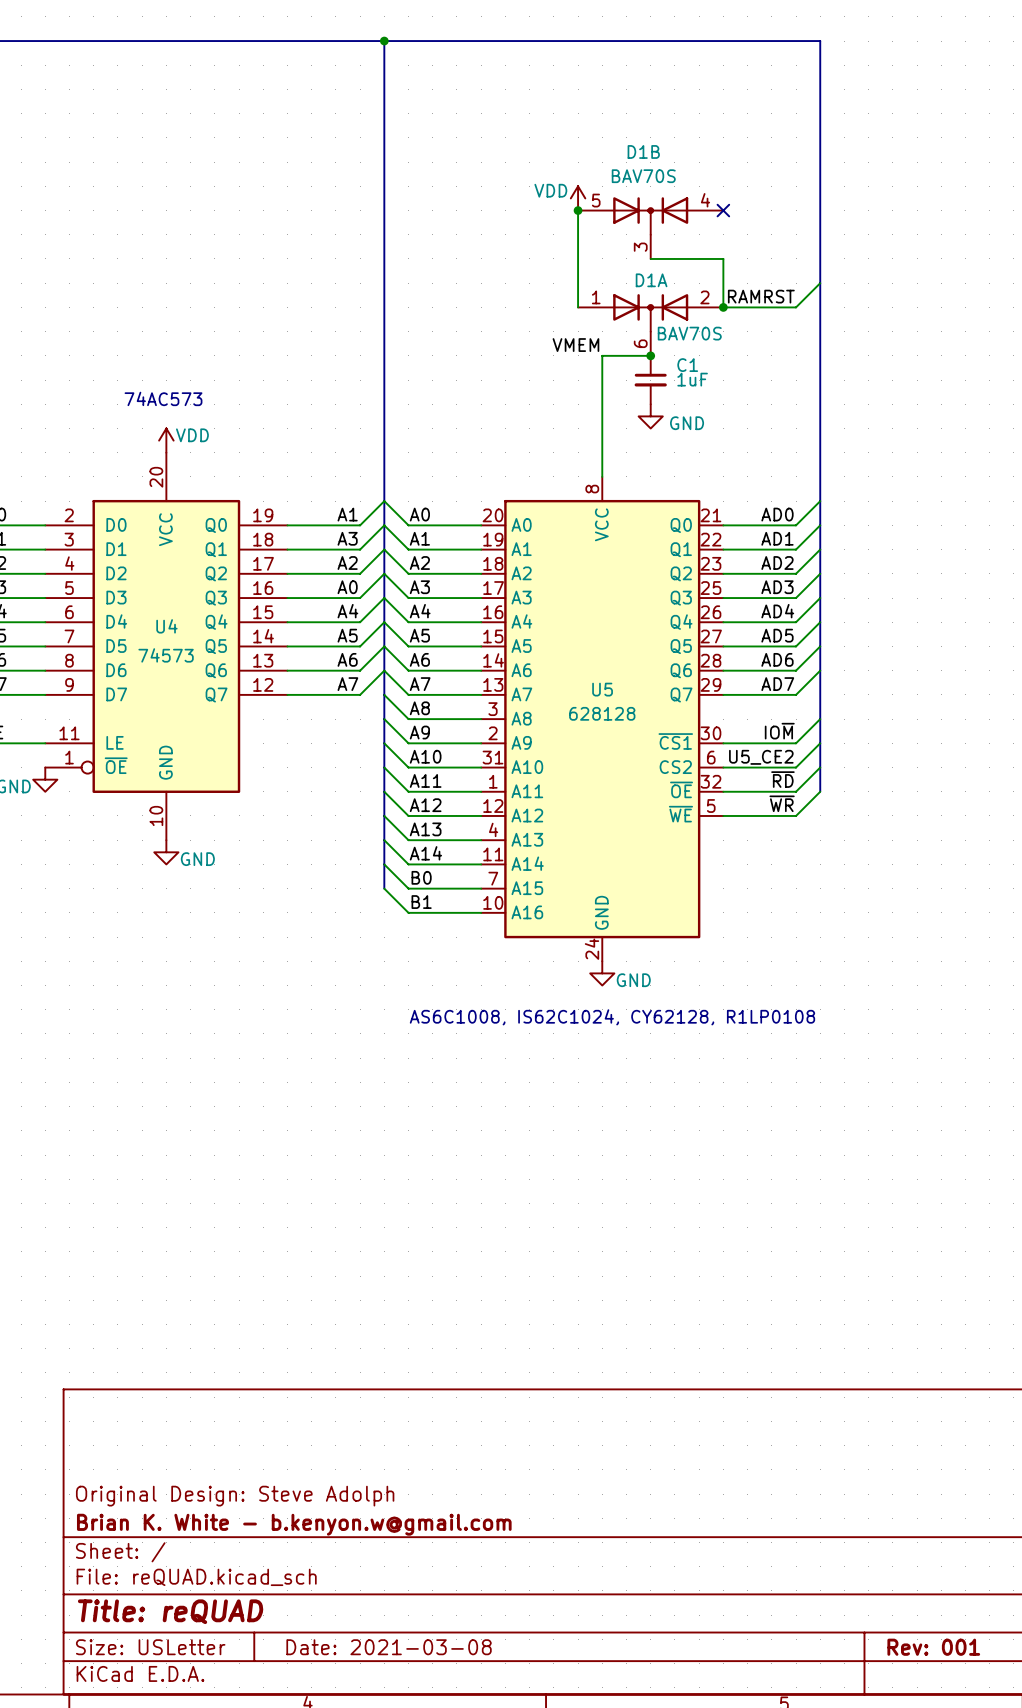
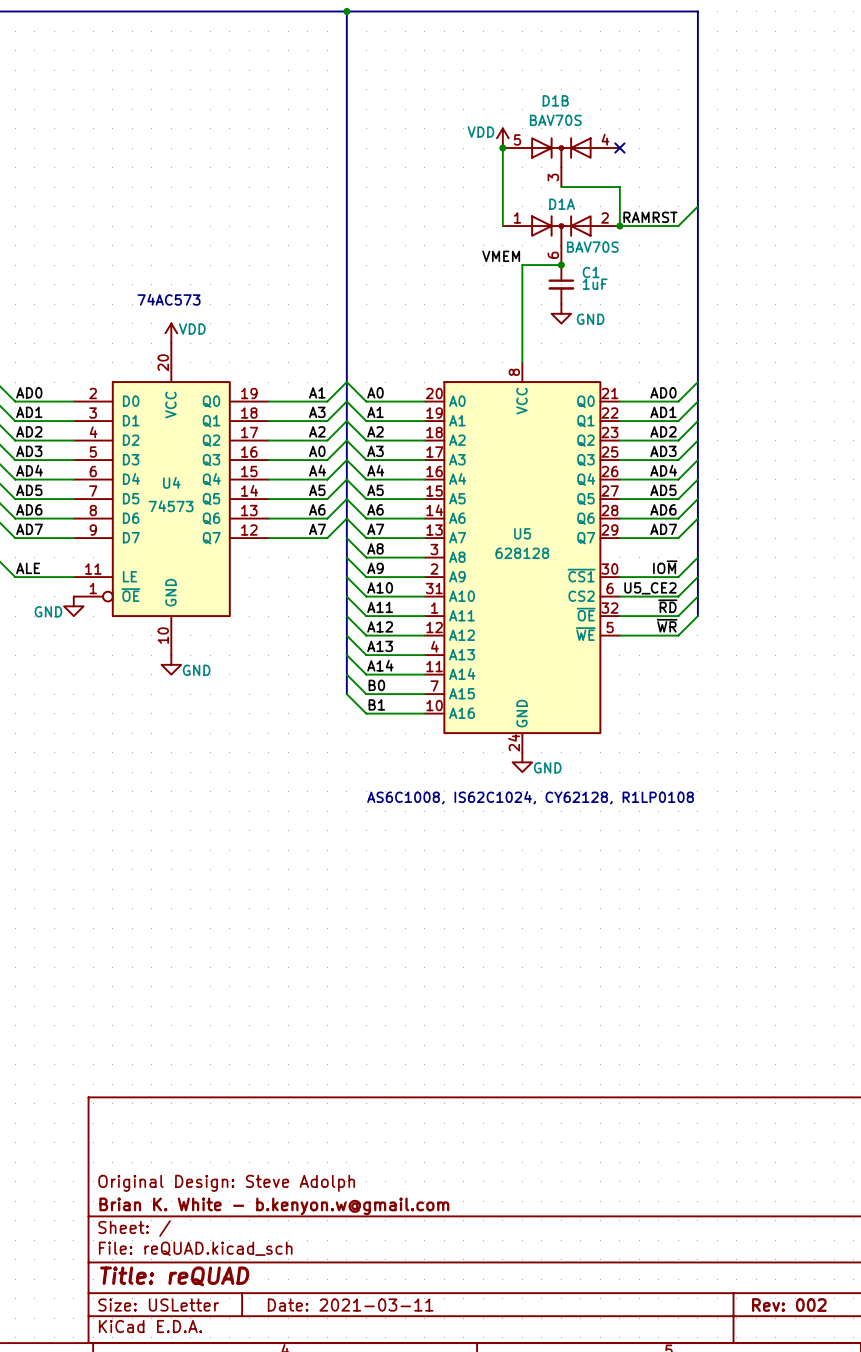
title block: Date: 2021-03-08 (389, 1647) -> Date: 2021-03-11 (350, 1305)
title block: Rev: 001 (933, 1647) -> Rev: 002 (789, 1305)

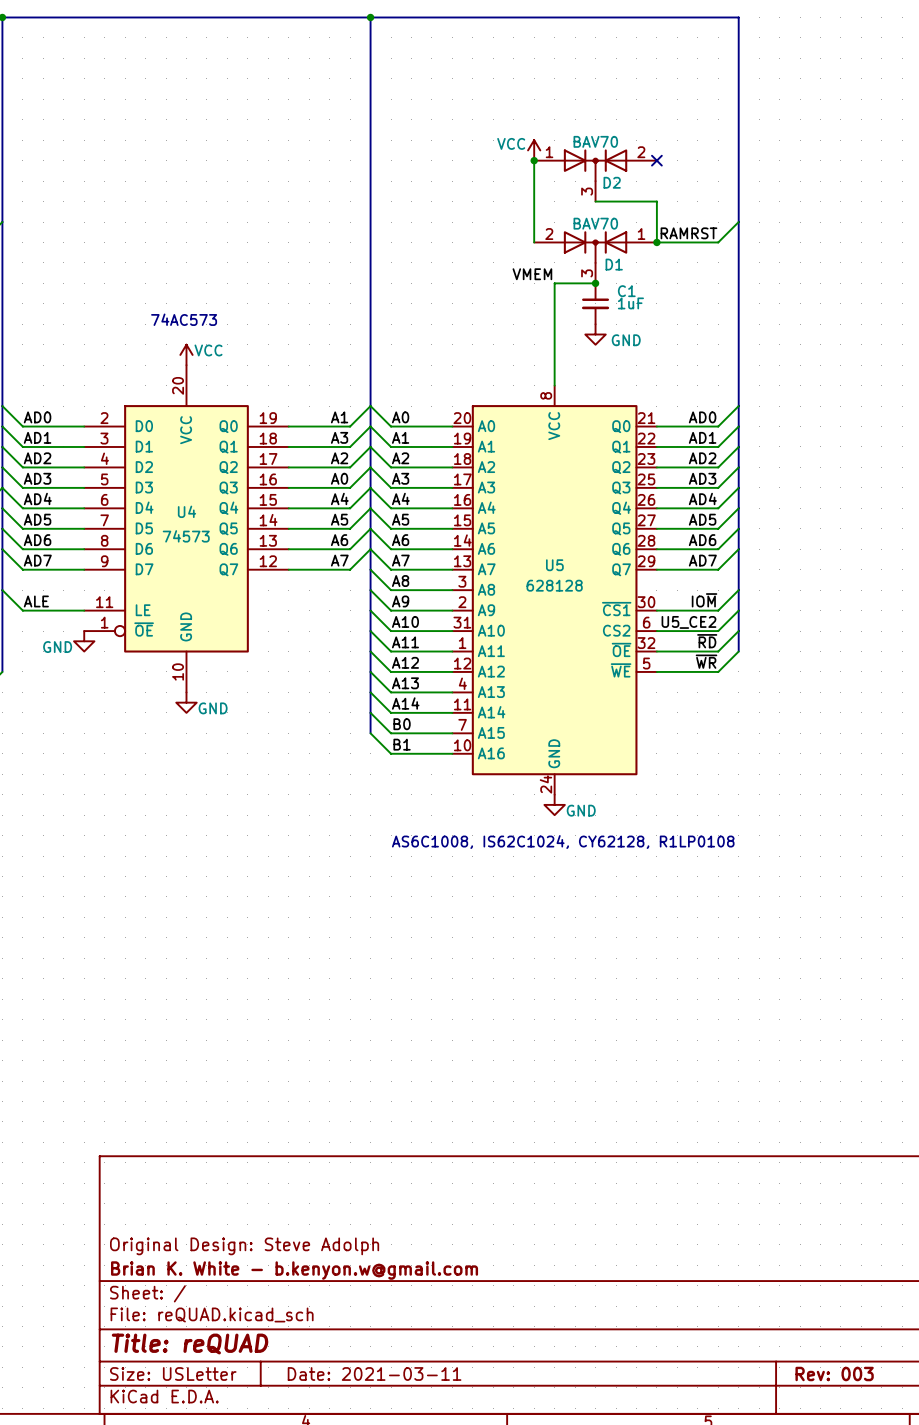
power symbol: VDD (502, 138) -> VCC (534, 150)
D1B: BAV70S (561, 162) -> none
D2: none -> BAV70 (595, 175)
D1A: BAV70S (561, 240) -> none
D1: none -> BAV70 (595, 257)
power symbol: VDD (171, 333) -> VCC (186, 354)
title block: Rev: 002 (789, 1305) -> Rev: 003 (834, 1373)

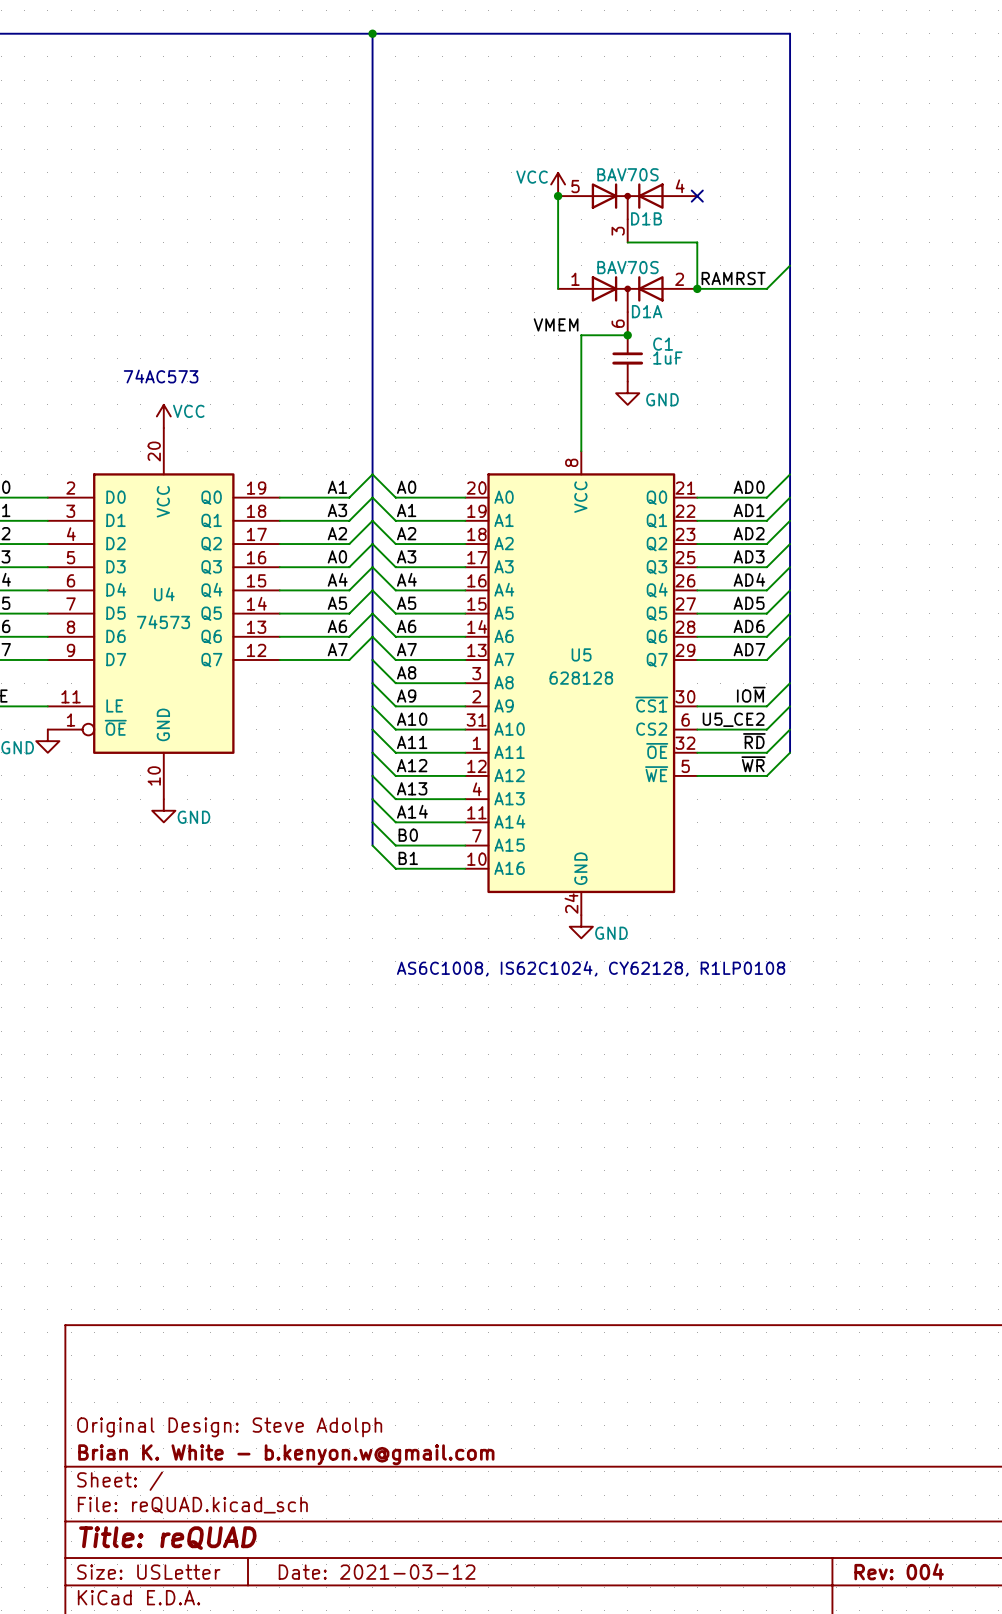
D2: BAV70 (595, 175) -> none
D1B: none -> BAV70S (627, 212)
D1: BAV70 (595, 257) -> none
D1A: none -> BAV70S (627, 305)
title block: Date: 2021-03-11 (374, 1373) -> Date: 2021-03-12 (377, 1572)
title block: Rev: 003 (834, 1373) -> Rev: 004 (899, 1571)

